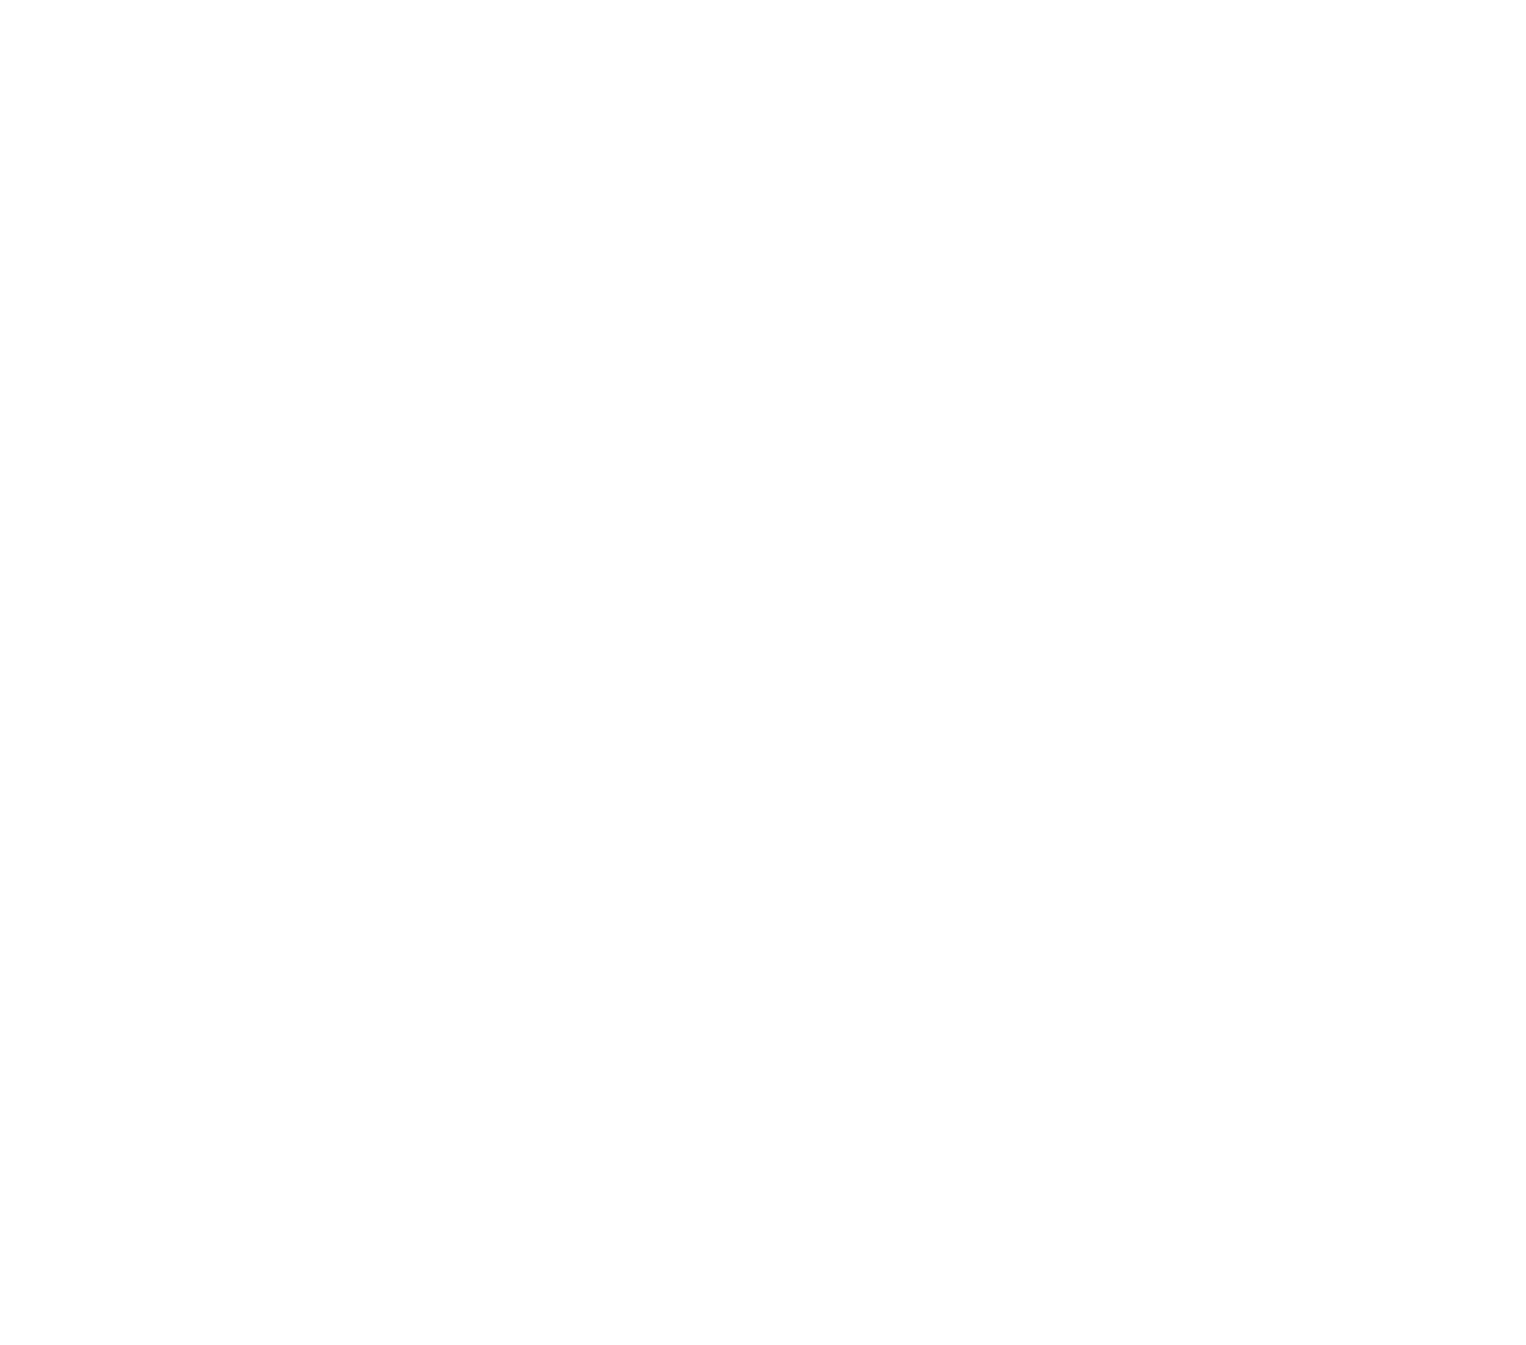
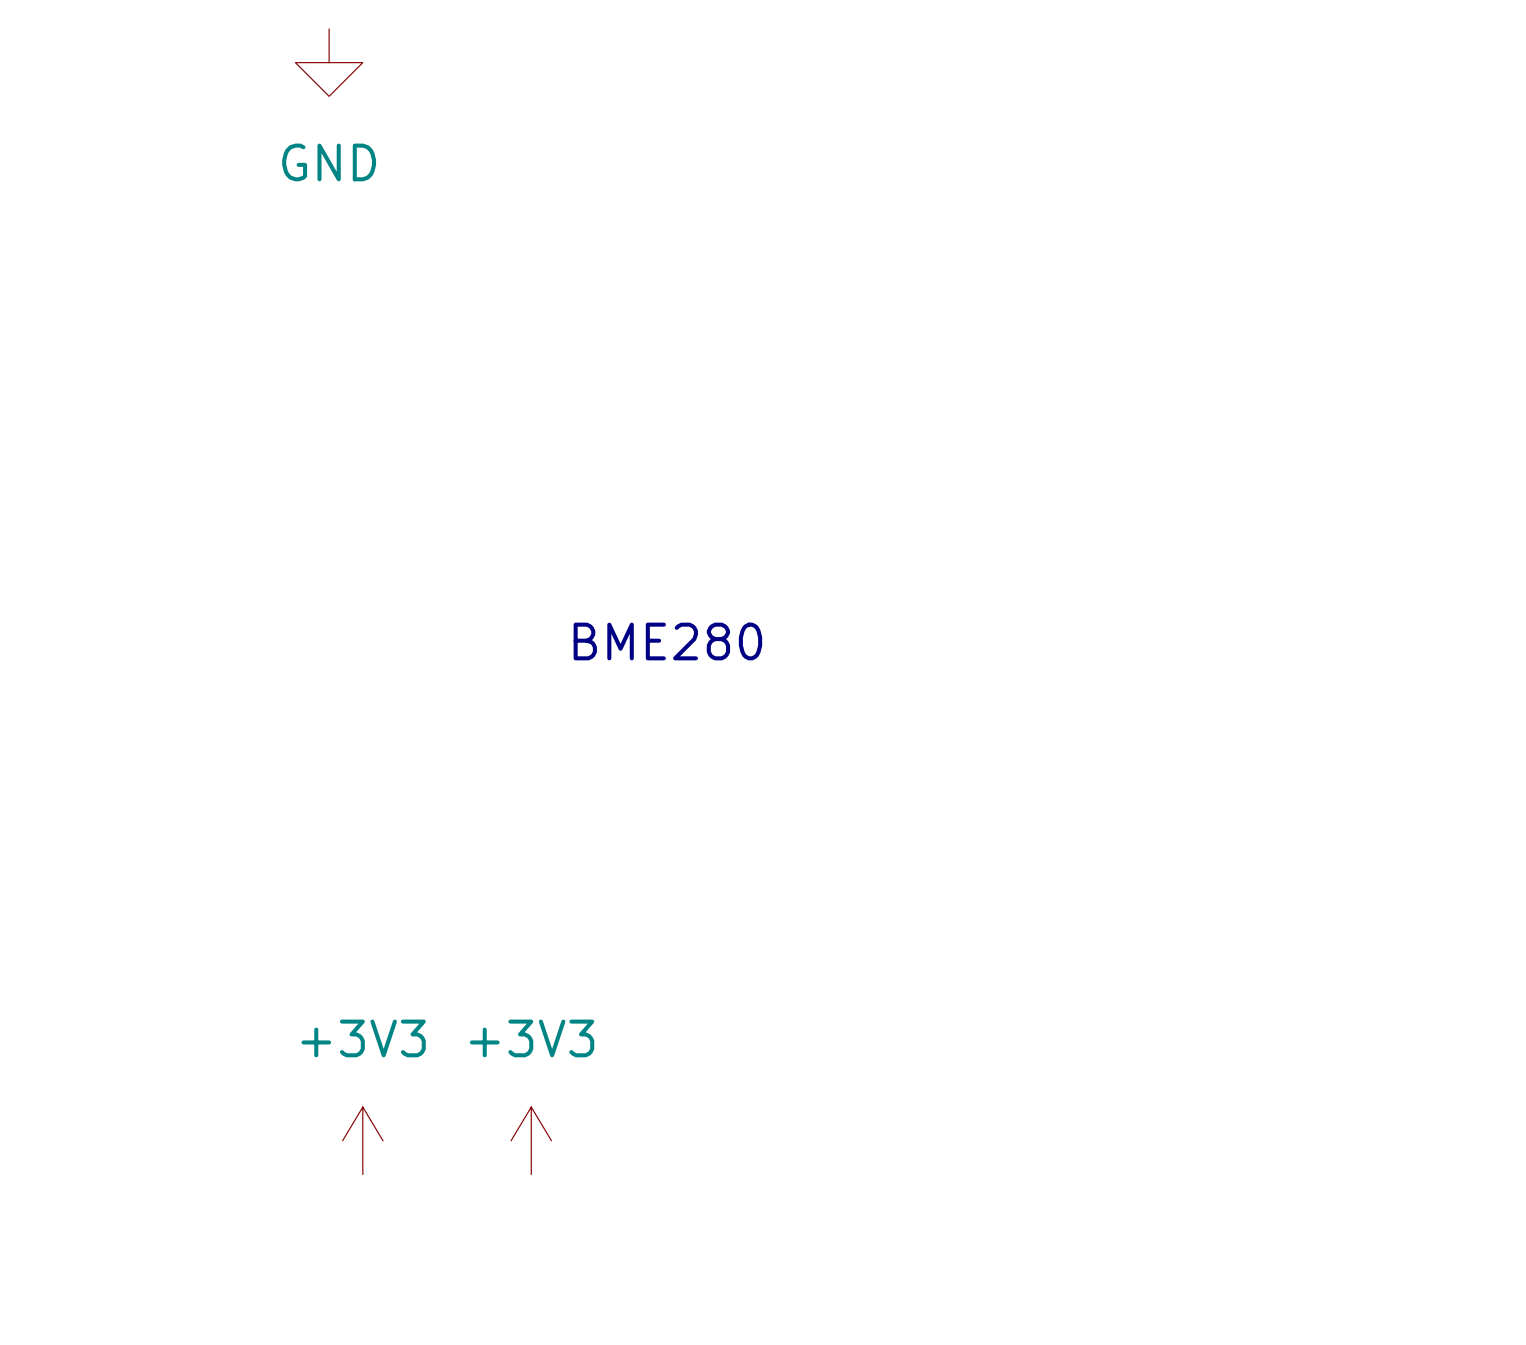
power symbol: none -> GND (329, 62)
text: none -> BME280 (667, 641)
power symbol: none -> +3V3 (362, 1140)
power symbol: none -> +3V3 (531, 1140)

